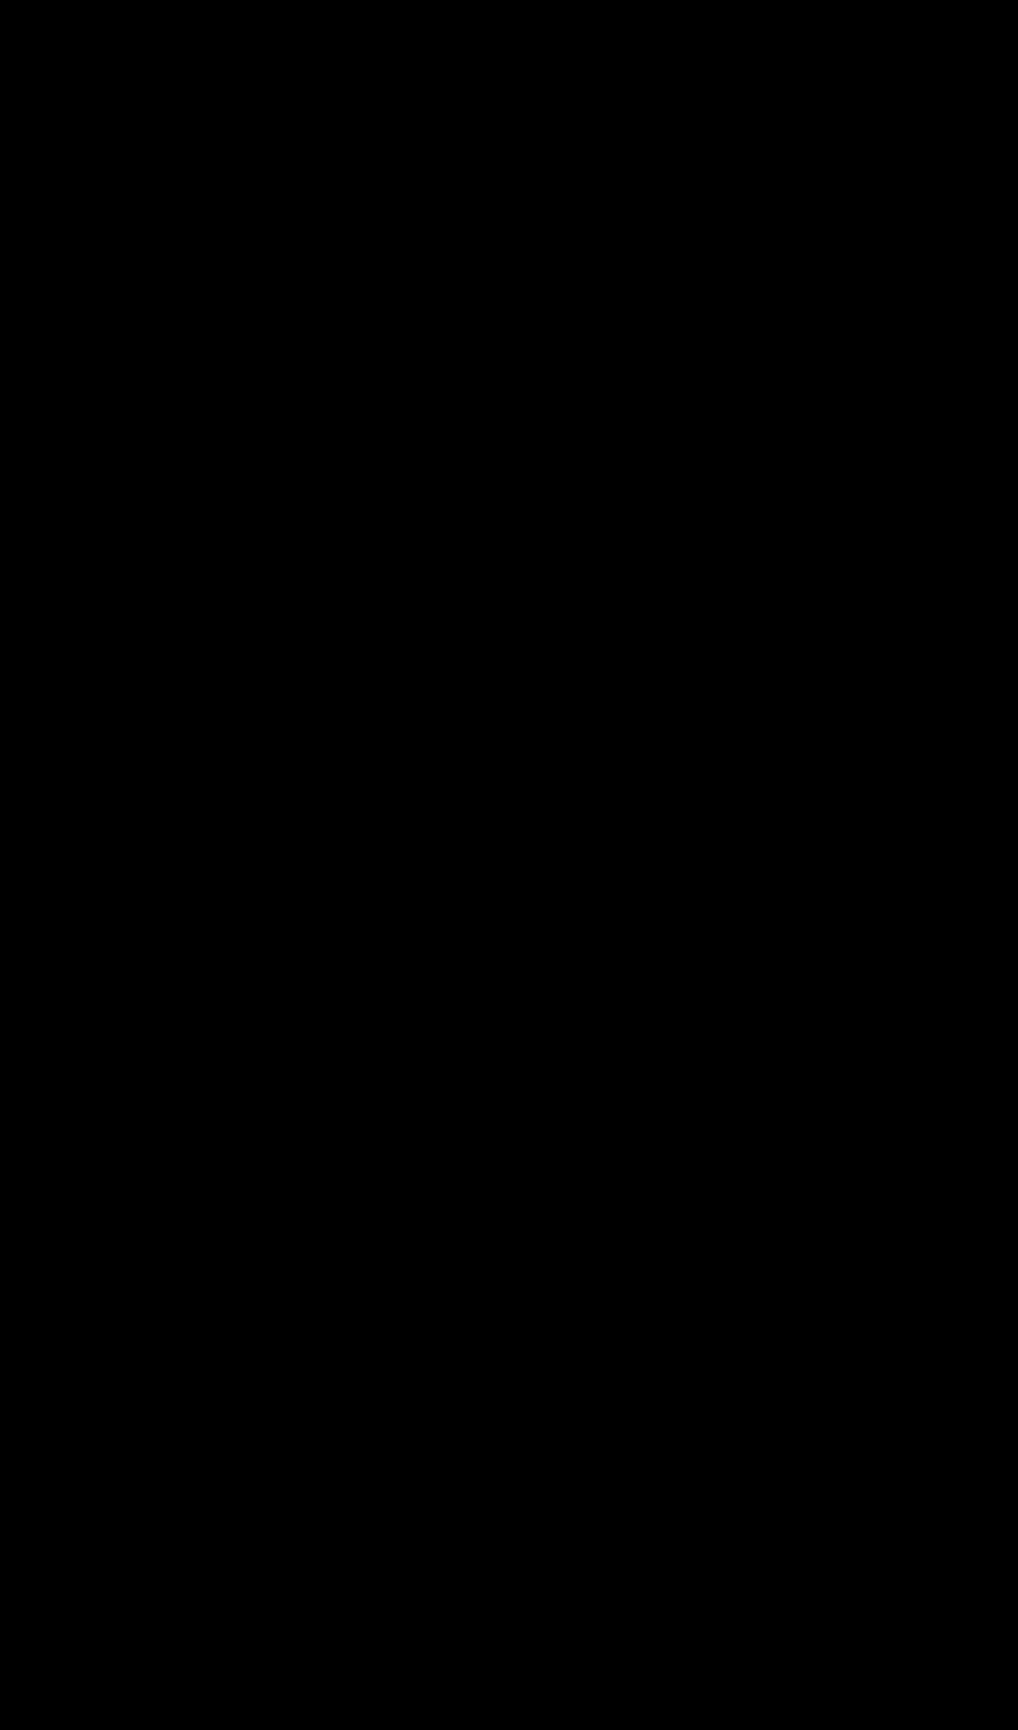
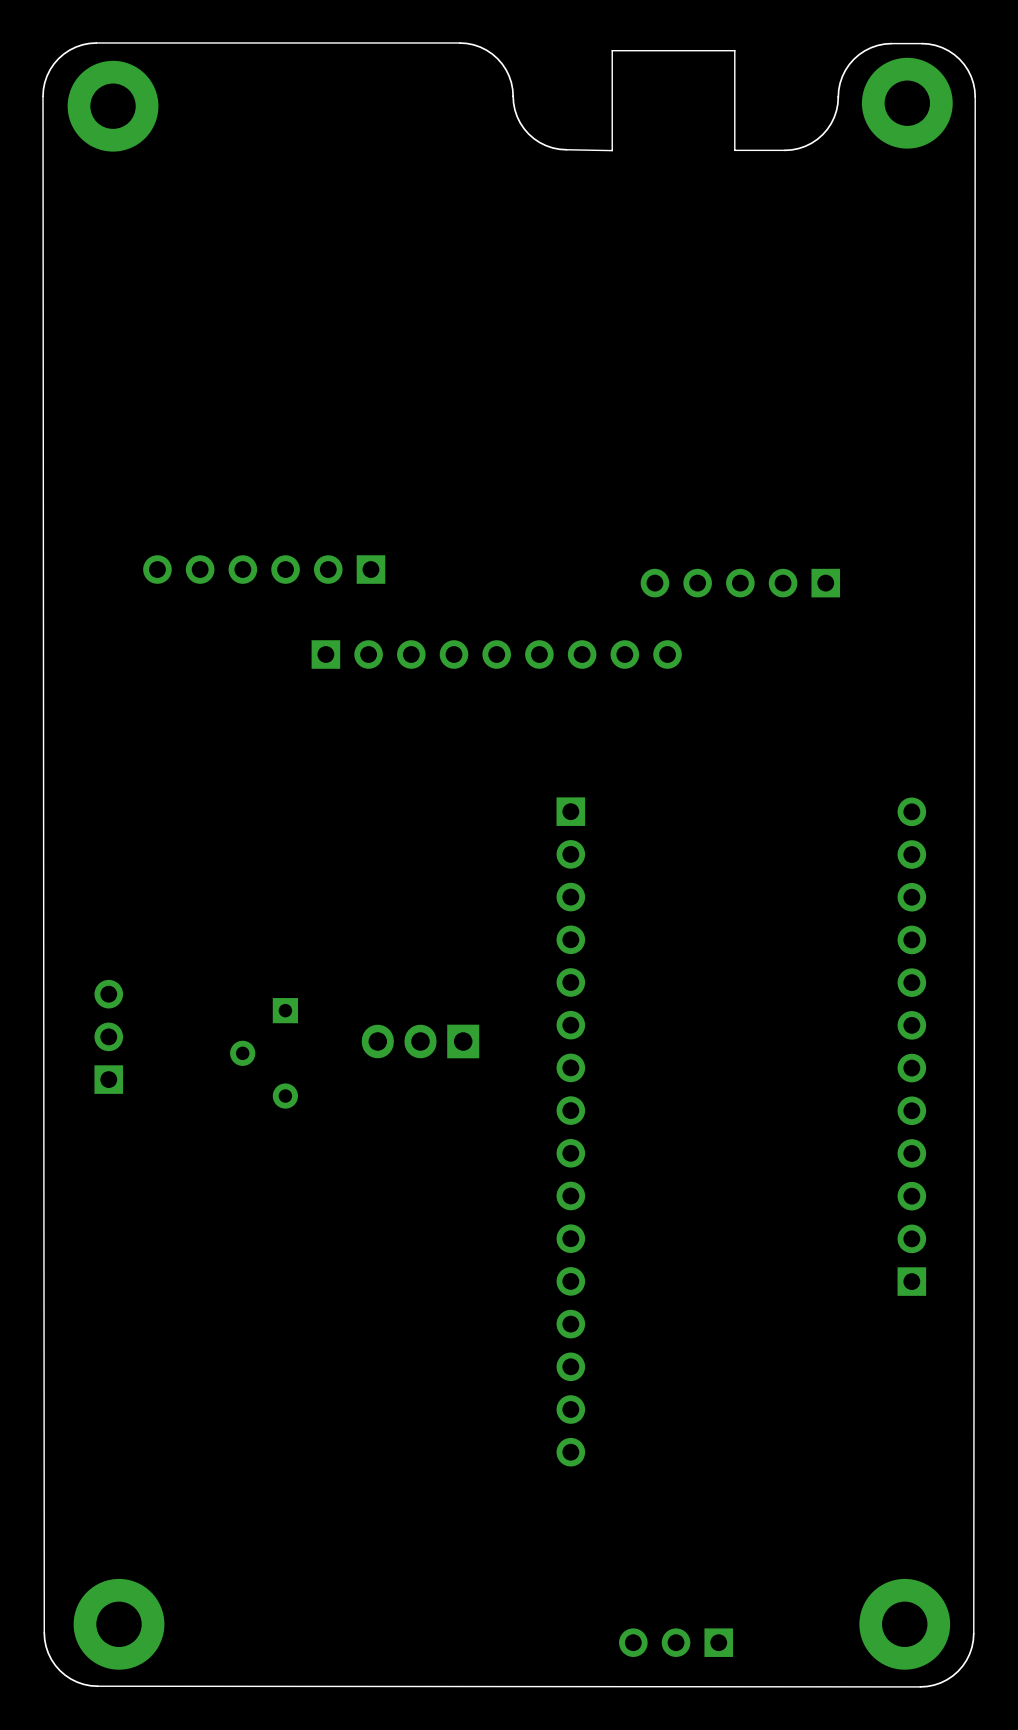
board edge: none -> (459, 43) (89, 43) (75, 47) (63, 54) (54, 63) (44, 82) (43, 96) (44, 1632) (46, 1646) (55, 1665) (65, 1675) (83, 1684) (97, 1686) (920, 1686) (934, 1685) (947, 1679) (962, 1666) (971, 1647) (973, 1633) (975, 96) (973, 83) (968, 70) (959, 59) (942, 47) (921, 43) (877, 45) (859, 54) (845, 70) (840, 83) (834, 117) (827, 129) (817, 139) (805, 146) (791, 149) (734, 150) (734, 50) (612, 50) (612, 150) (559, 149) (539, 142) (524, 128) (514, 110) (509, 75) (497, 58) (480, 47) (459, 43)
part: none -> (907, 103)
part: none -> (113, 106)
part: none -> (264, 569)
part: none -> (740, 583)
part: none -> (496, 654)
part: none -> (108, 1036)
part: none -> (420, 1041)
part: none -> (911, 1046)
part: none -> (264, 1053)
part: none -> (570, 1131)
part: none -> (119, 1624)
part: none -> (904, 1624)
part: none -> (676, 1642)

